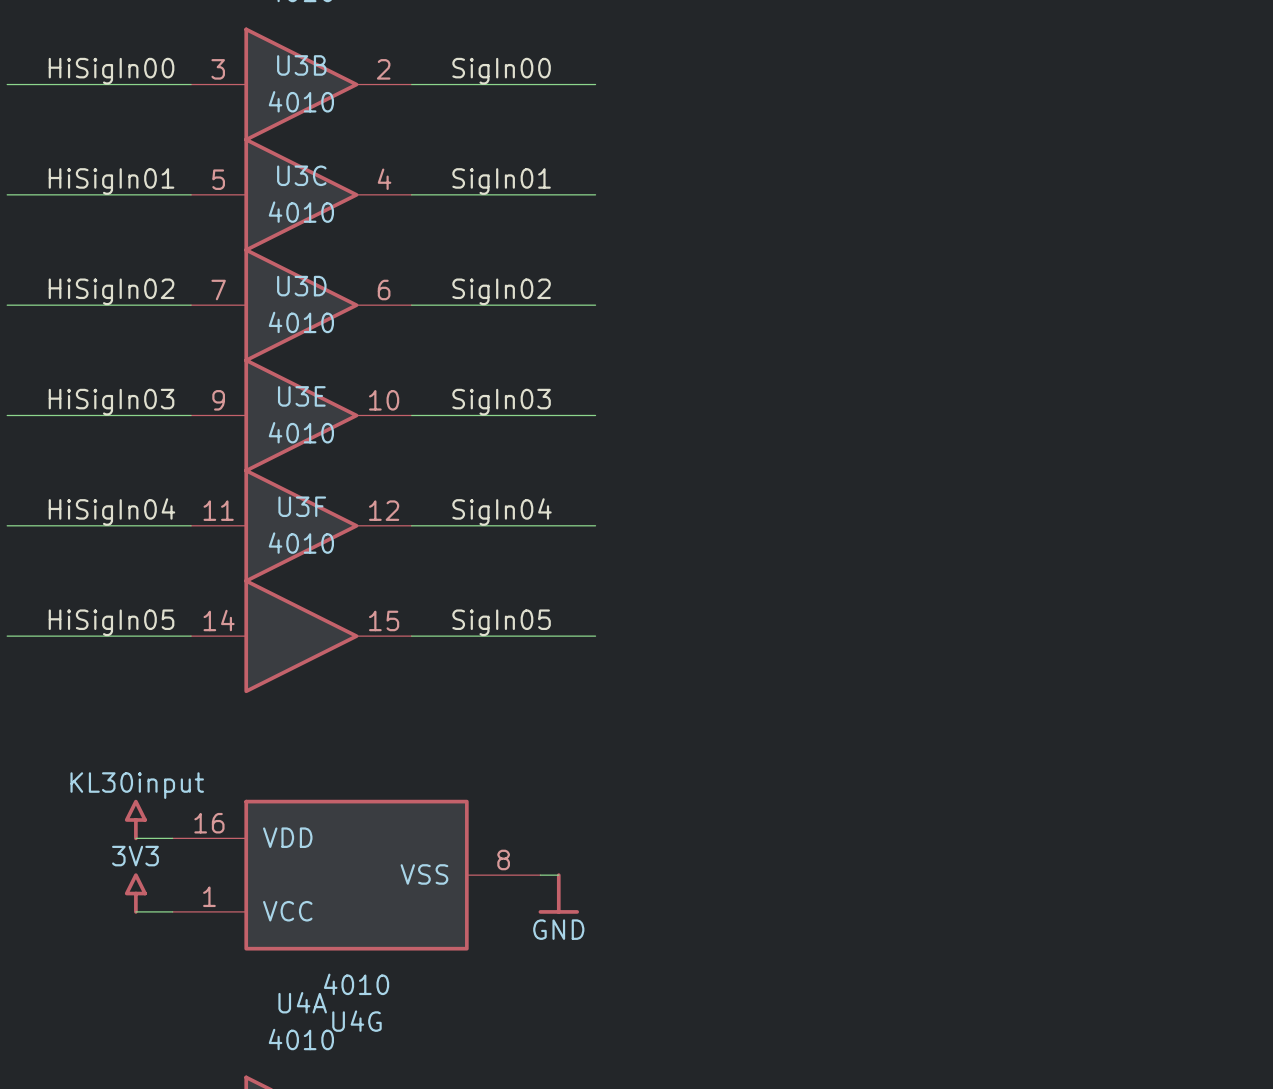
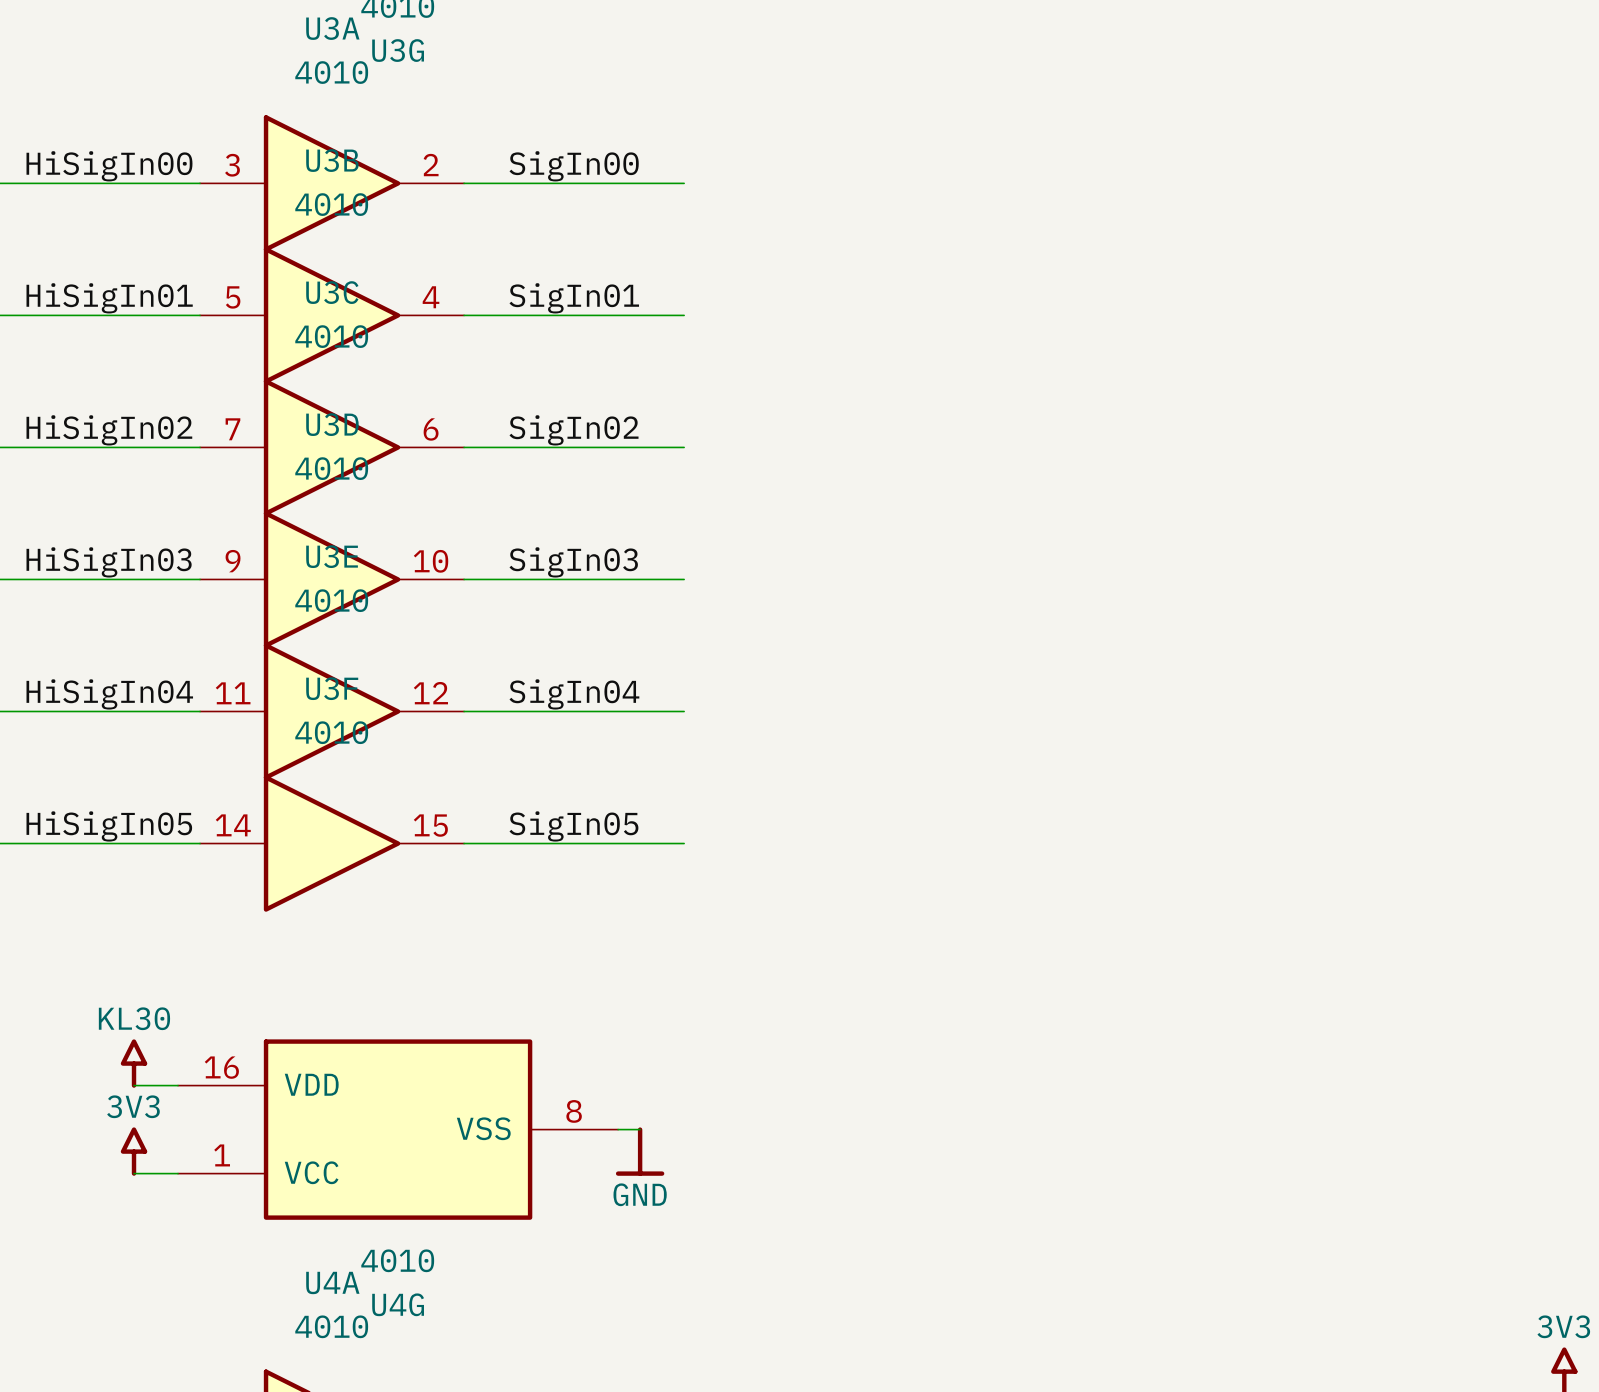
power symbol: KL30input (135, 819) -> KL30 (134, 1063)

